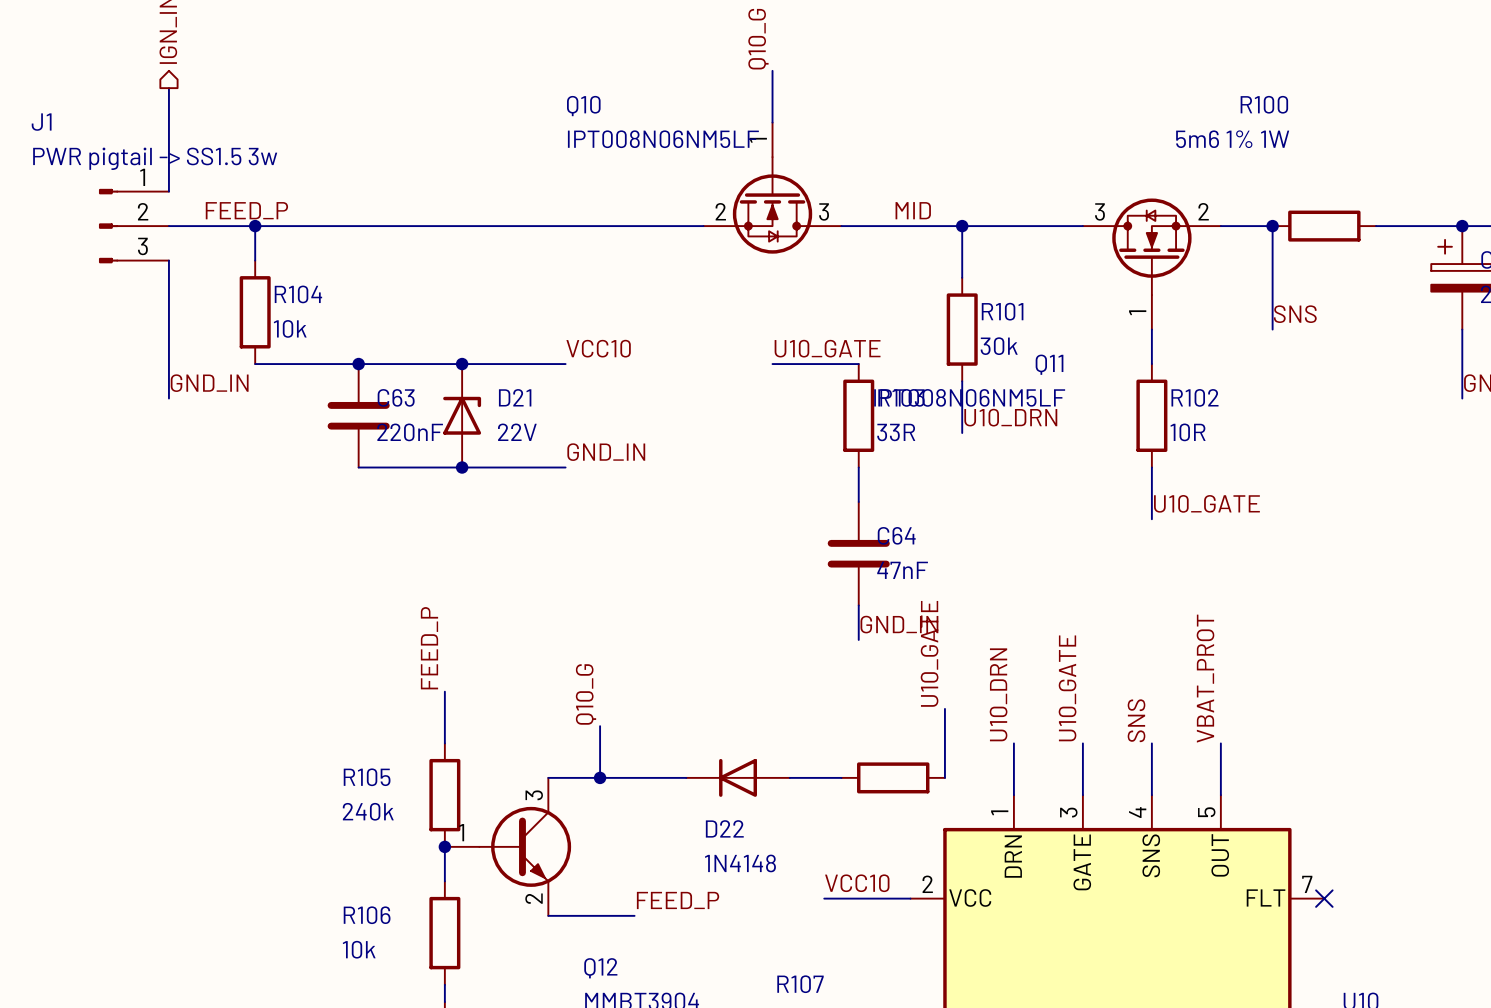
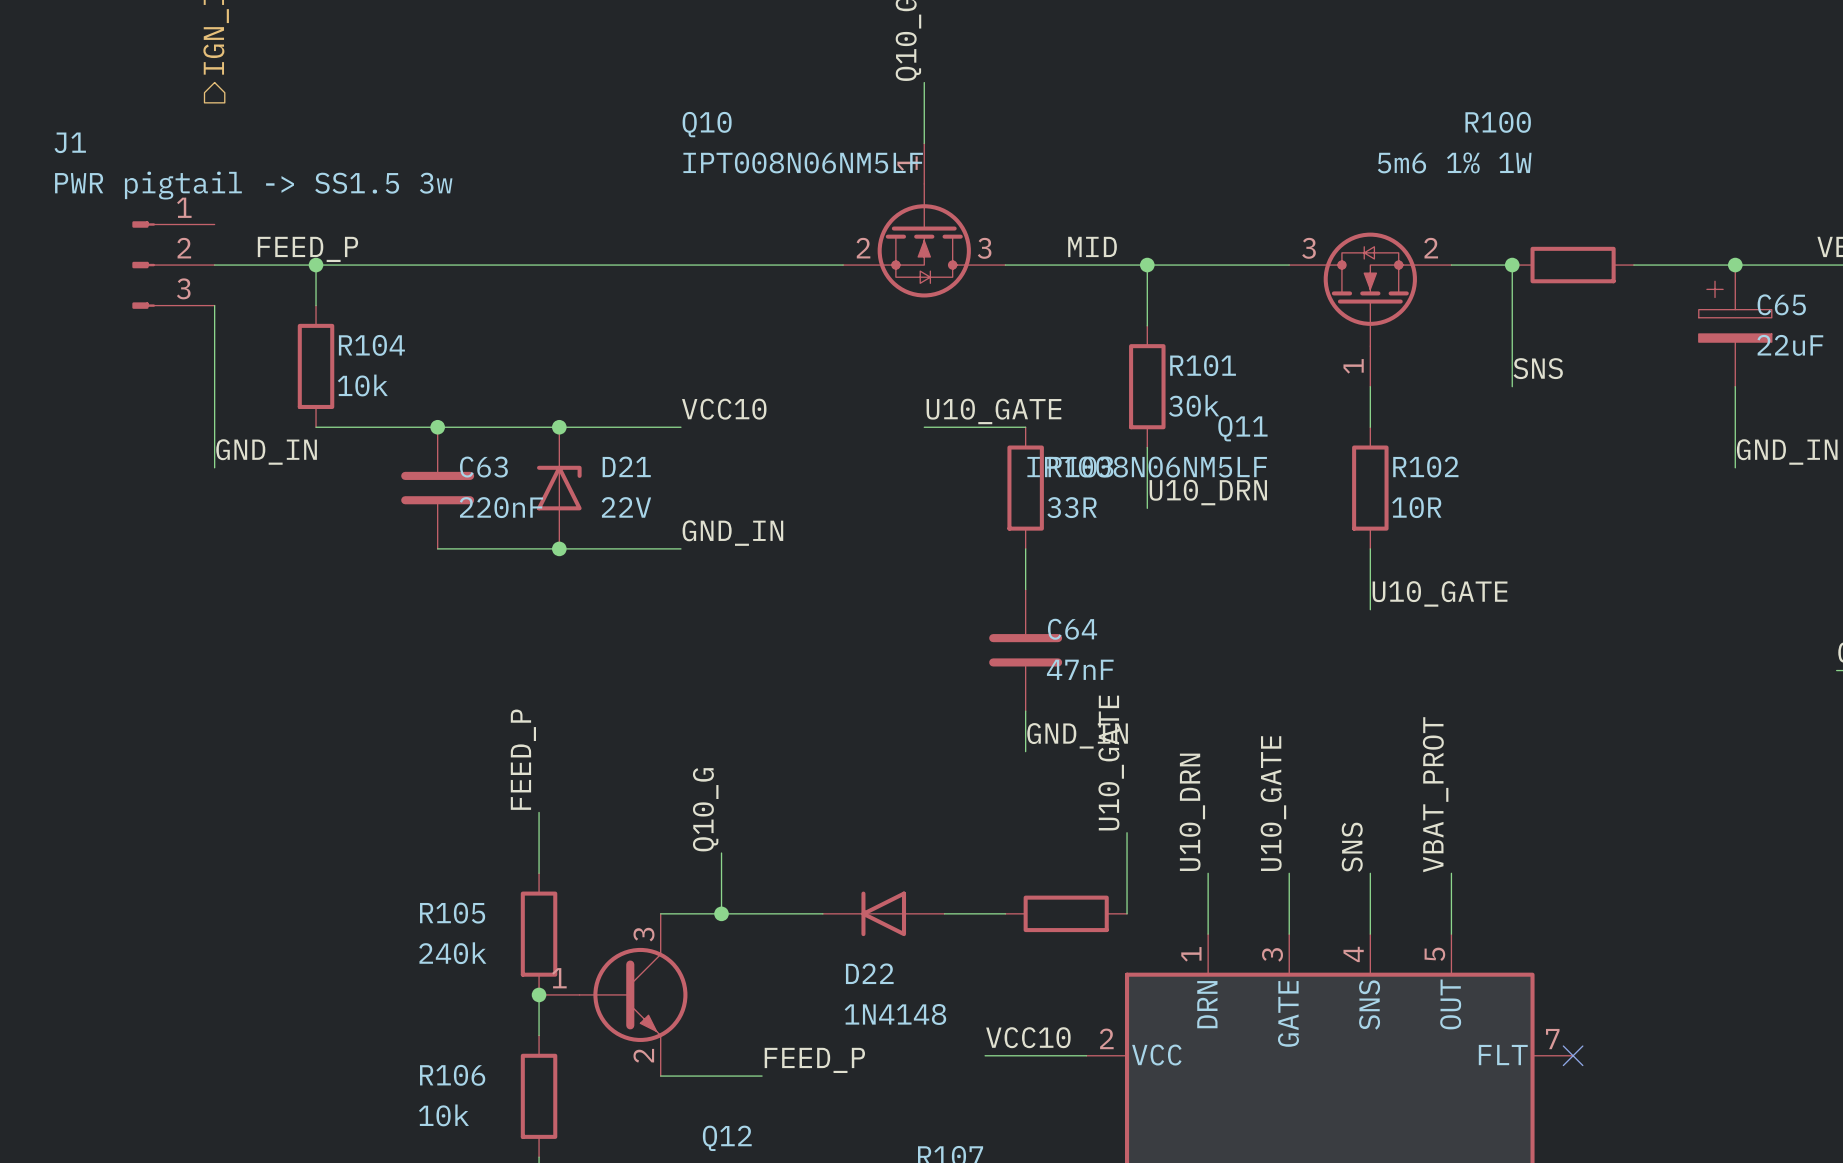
wire: (168, 88) (168, 191) -> none

